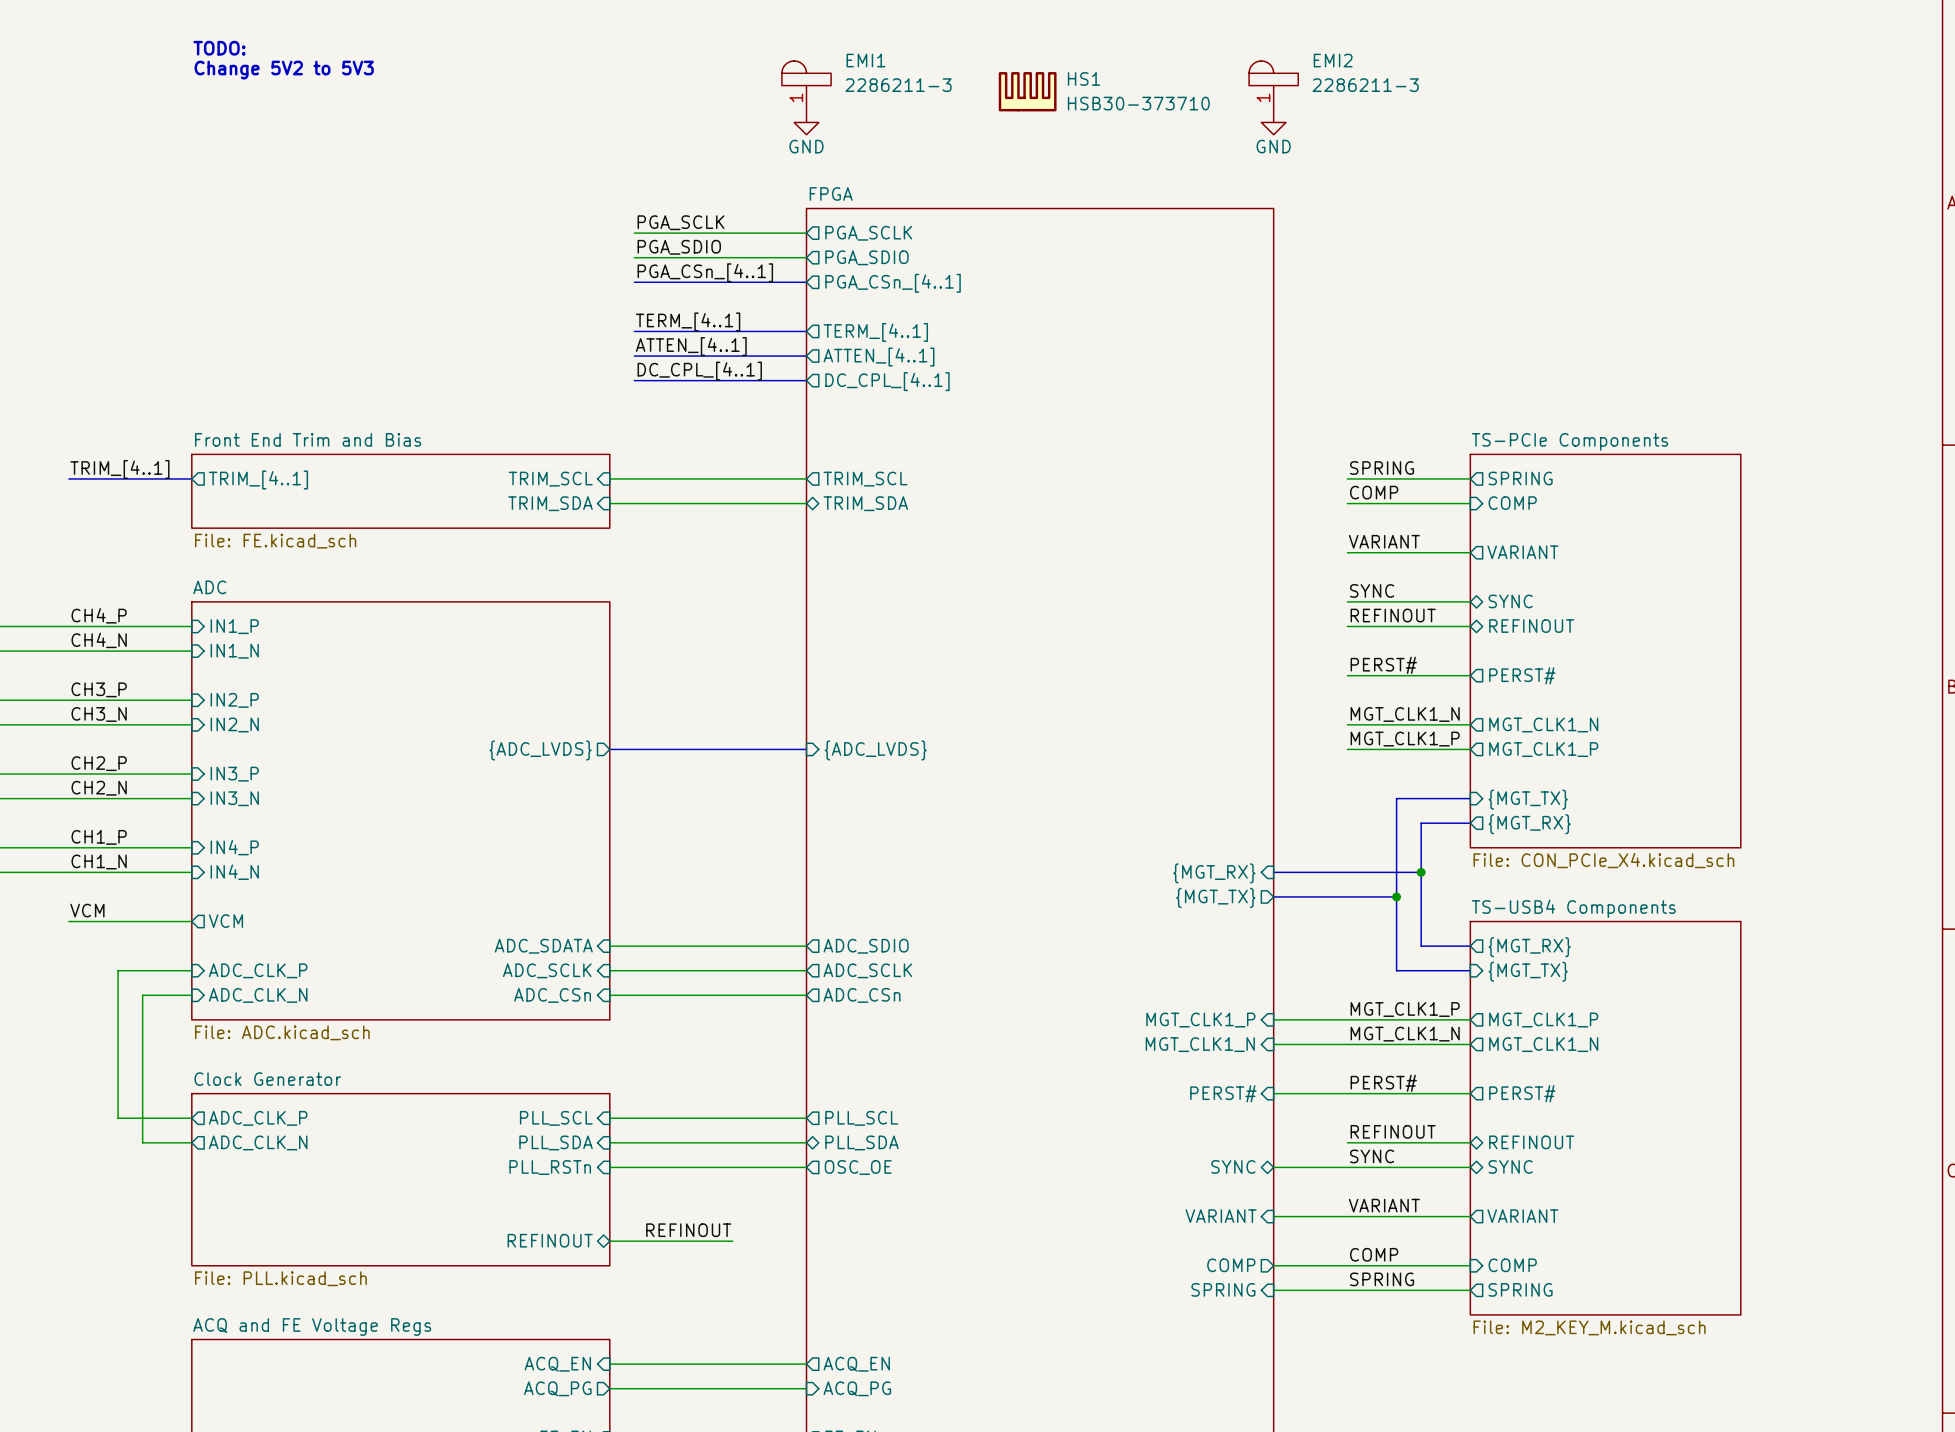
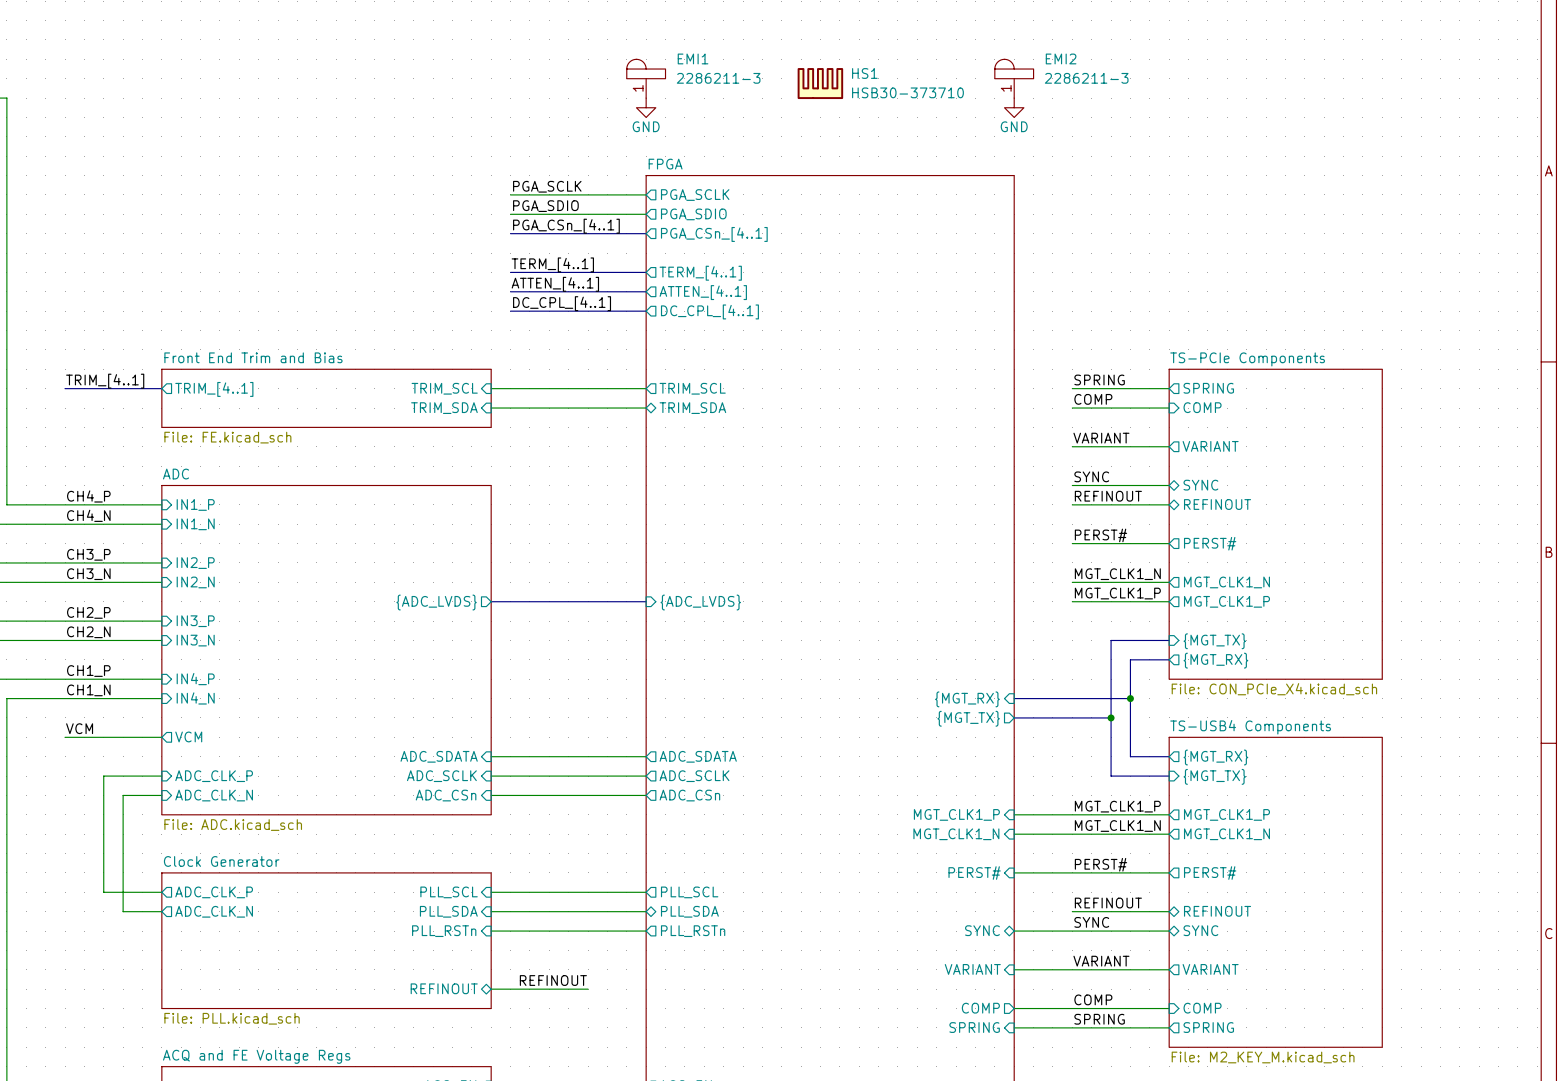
text: TODO: (219, 48) -> none
text: Change 5V2 to 5V3 (284, 70) -> none
sheet pin: ADC_SDIO (866, 946) -> ADC_SDATA (698, 756)
sheet pin: OSC_OE (858, 1167) -> PLL_RSTn (693, 931)

